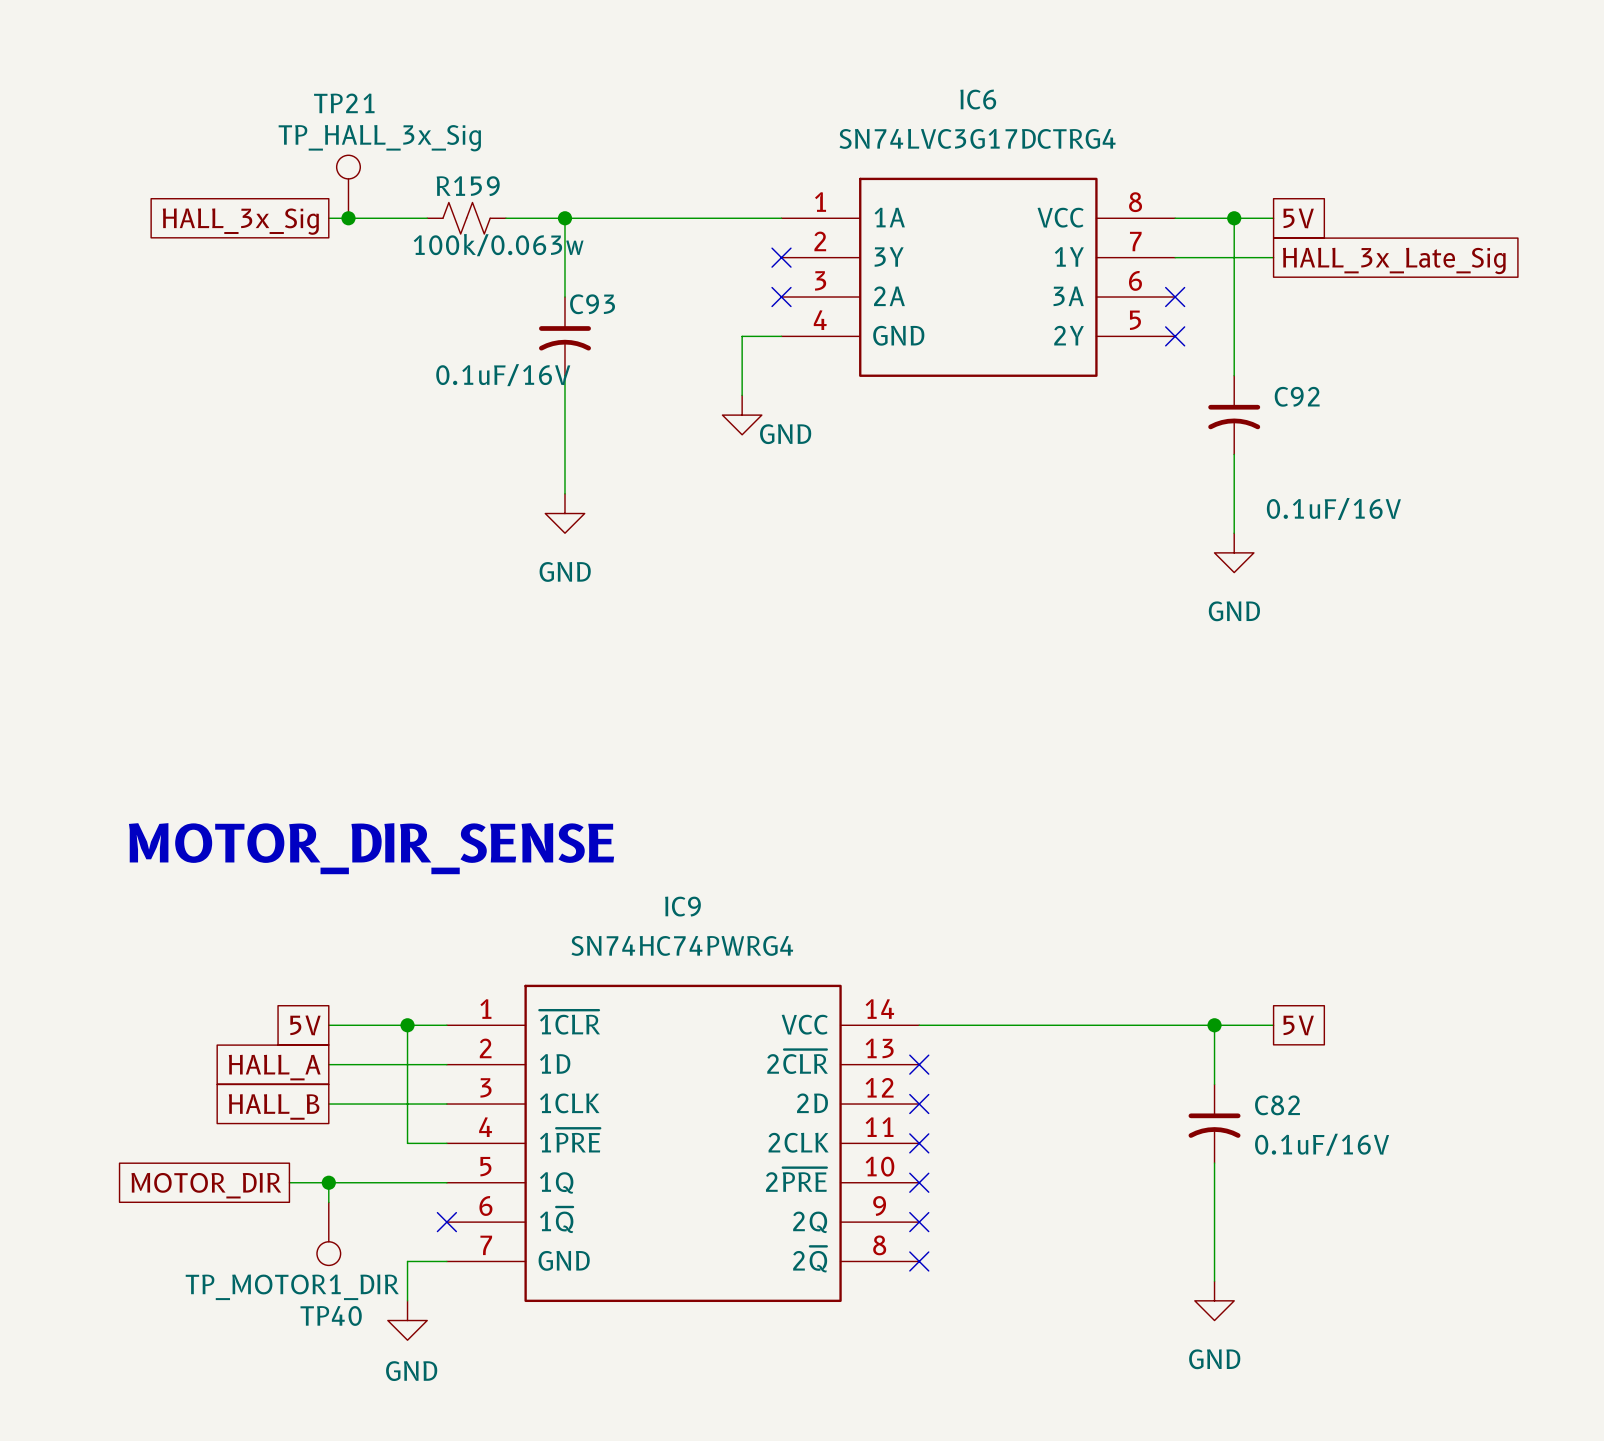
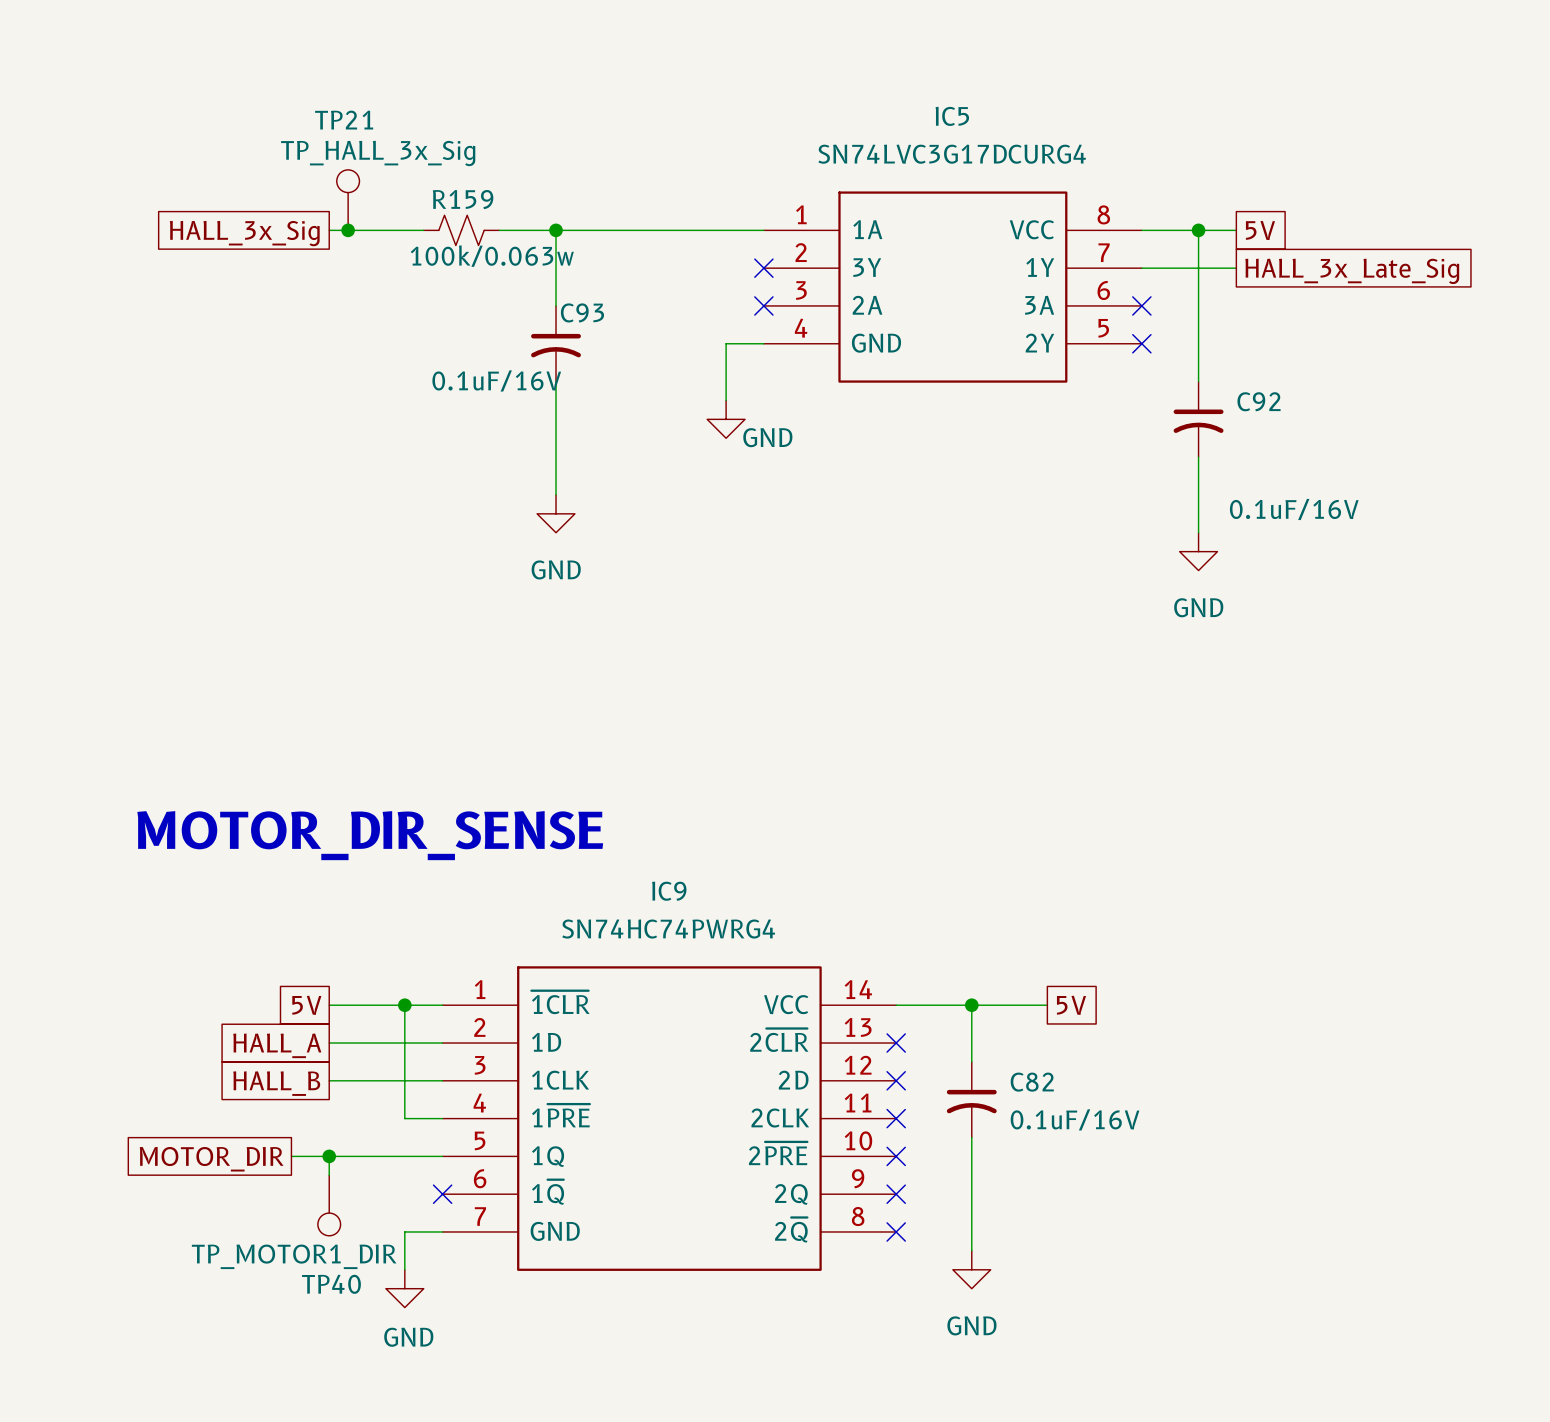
IC6 name: IC6 (978, 99) -> IC5 (952, 116)
IC6 value: SN74LVC3G17DCTRG4 (977, 138) -> SN74LVC3G17DCURG4 (952, 154)
junction: none -> (971, 1005)
wire: (1076, 1025) (1273, 1025) -> none
wire: (1214, 1025) (1214, 1084) -> (971, 1005) (971, 1061)
junction: (1214, 1025) -> none
global label position: 5V (1298, 1025) -> 5V (1071, 1005)
C82 position: (1214, 1123) -> (971, 1099)
wire: (1214, 1163) (1214, 1281) -> (971, 1137) (971, 1250)
power symbol position: GND (1214, 1300) -> GND (971, 1269)

